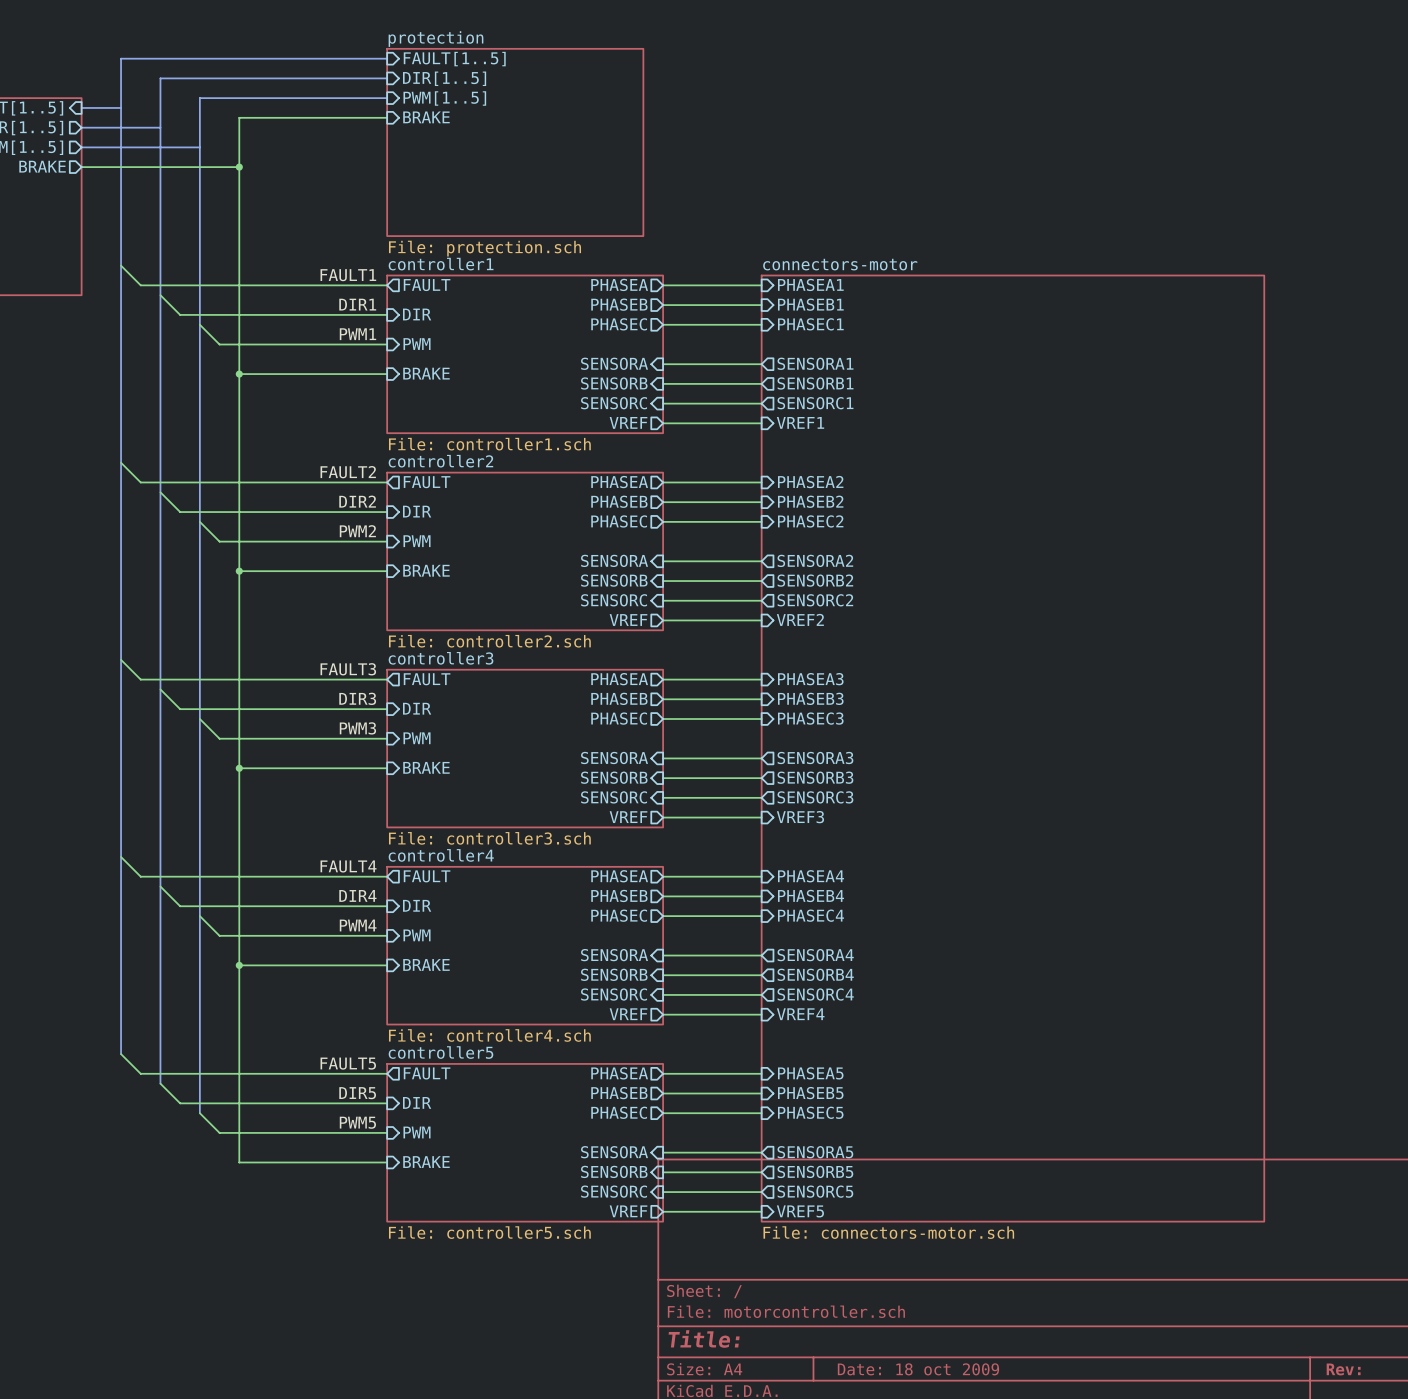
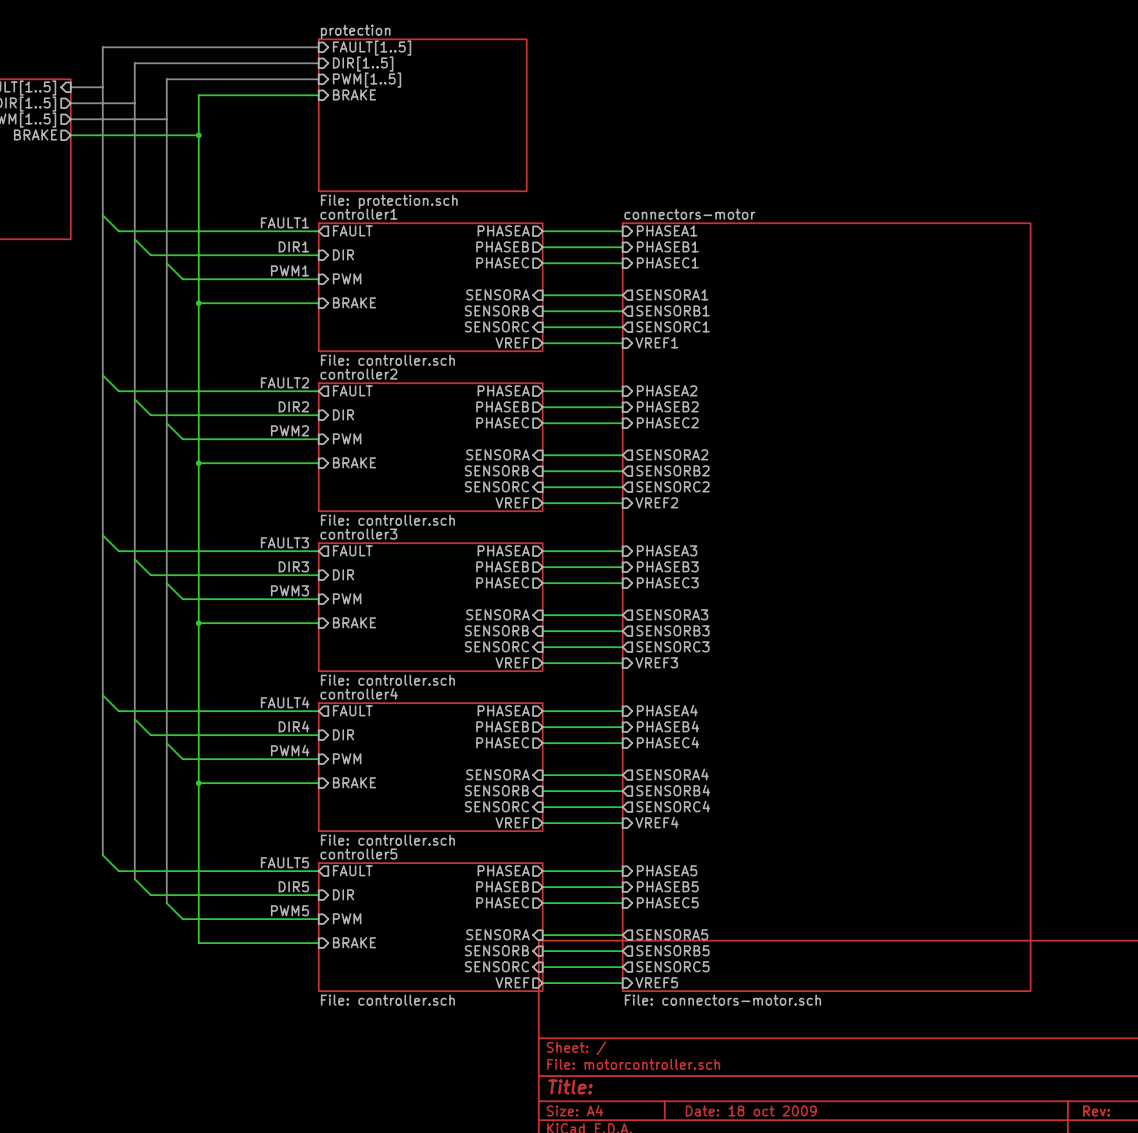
sheet controller1 value: File: controller1.sch (489, 444) -> File: controller.sch (387, 360)
sheet controller2 value: File: controller2.sch (489, 641) -> File: controller.sch (387, 520)
sheet controller3 value: File: controller3.sch (489, 838) -> File: controller.sch (387, 680)
sheet controller4 value: File: controller4.sch (489, 1035) -> File: controller.sch (387, 840)
sheet controller5 value: File: controller5.sch (489, 1232) -> File: controller.sch (387, 1000)

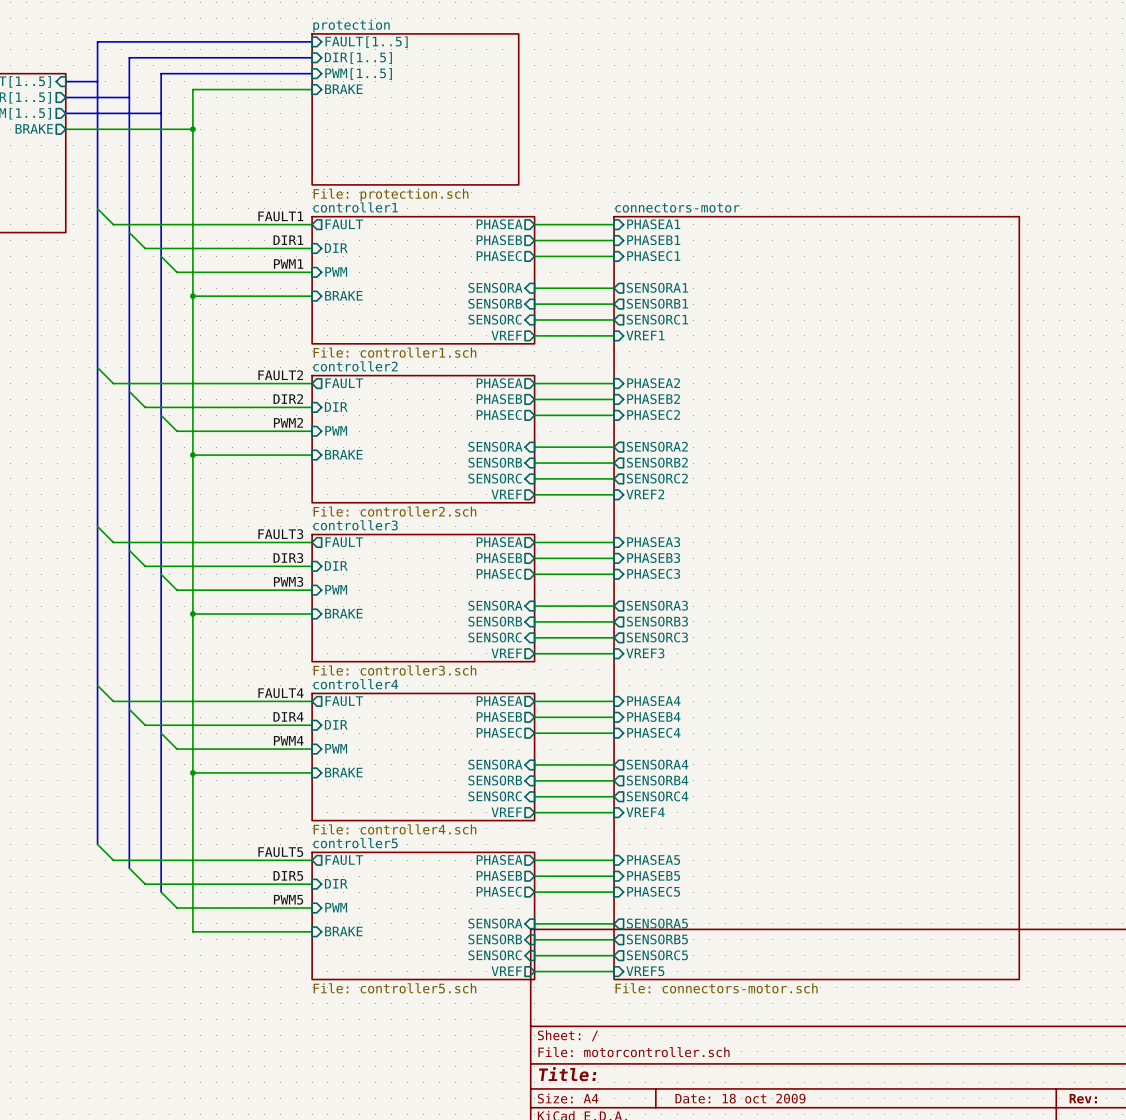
sheet controller1 value: File: controller.sch (387, 360) -> File: controller1.sch (394, 352)
sheet controller2 value: File: controller.sch (387, 520) -> File: controller2.sch (394, 511)
sheet controller3 value: File: controller.sch (387, 680) -> File: controller3.sch (394, 670)
sheet controller4 value: File: controller.sch (387, 840) -> File: controller4.sch (394, 829)
sheet controller5 value: File: controller.sch (387, 1000) -> File: controller5.sch (394, 988)

